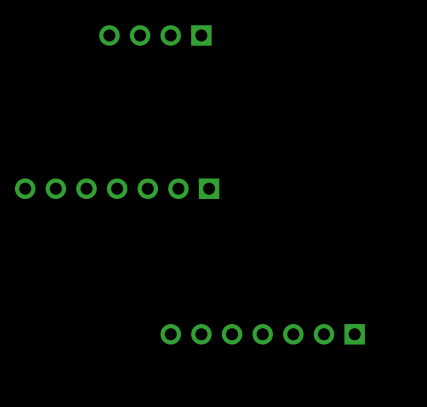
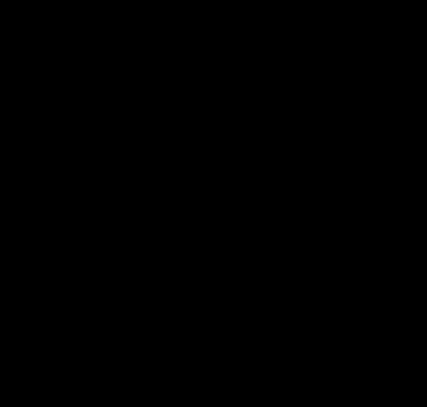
part: (155, 35) -> none
part: (117, 188) -> none
part: (262, 334) -> none

